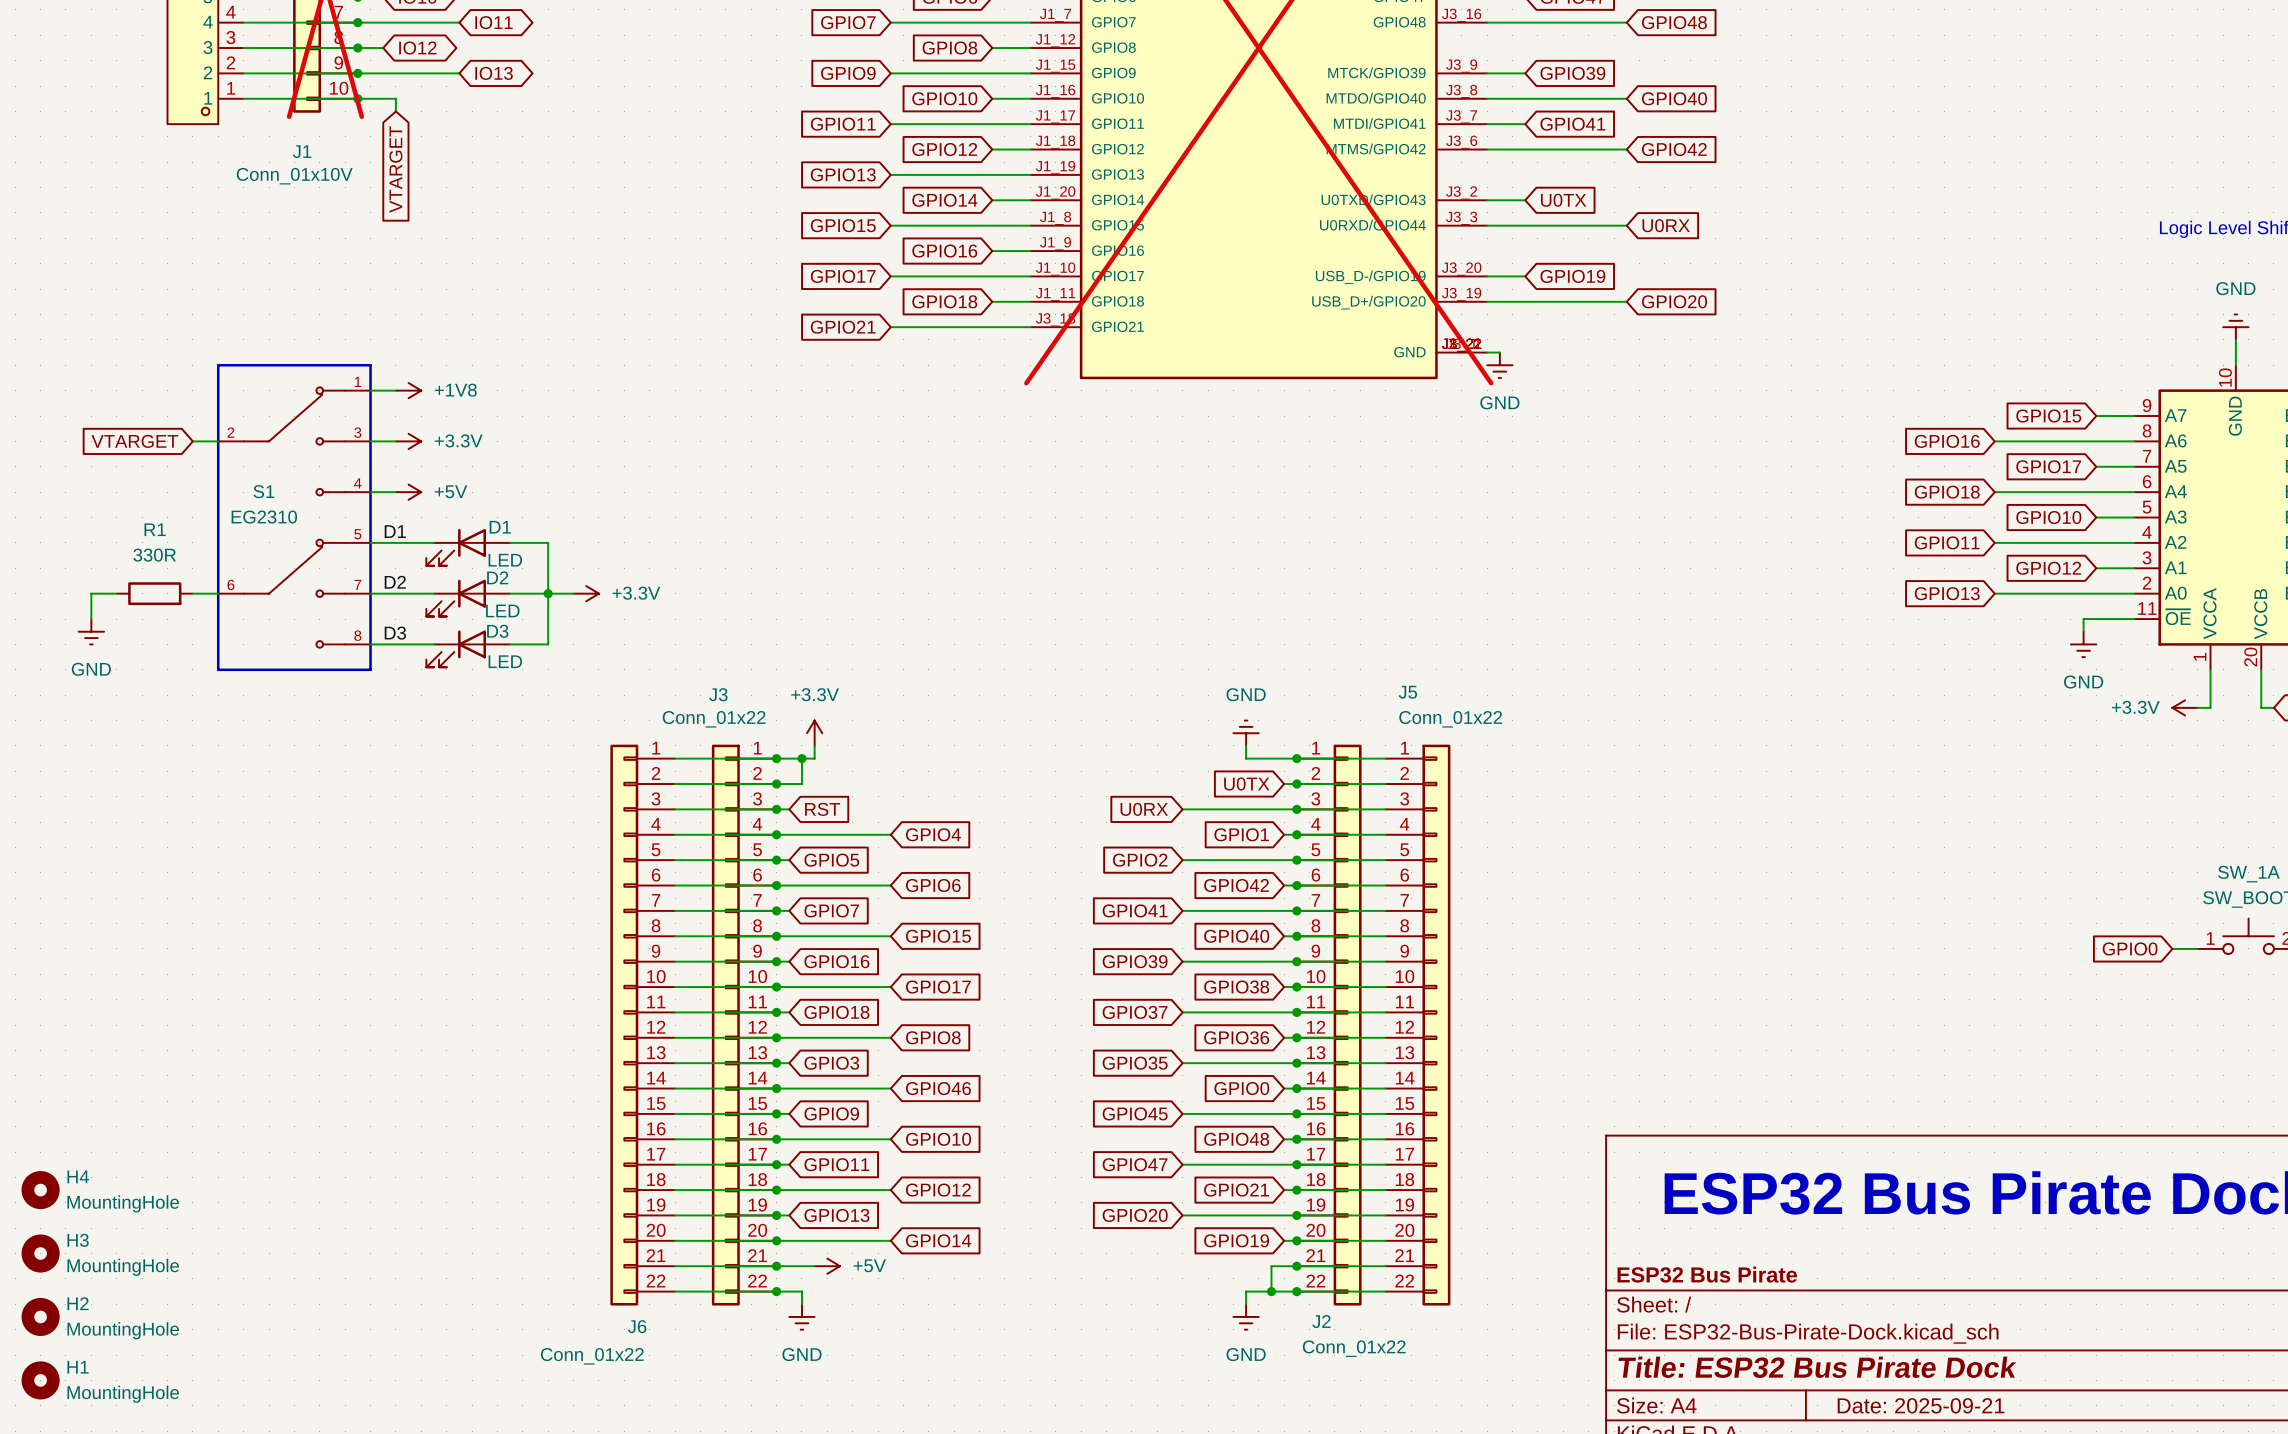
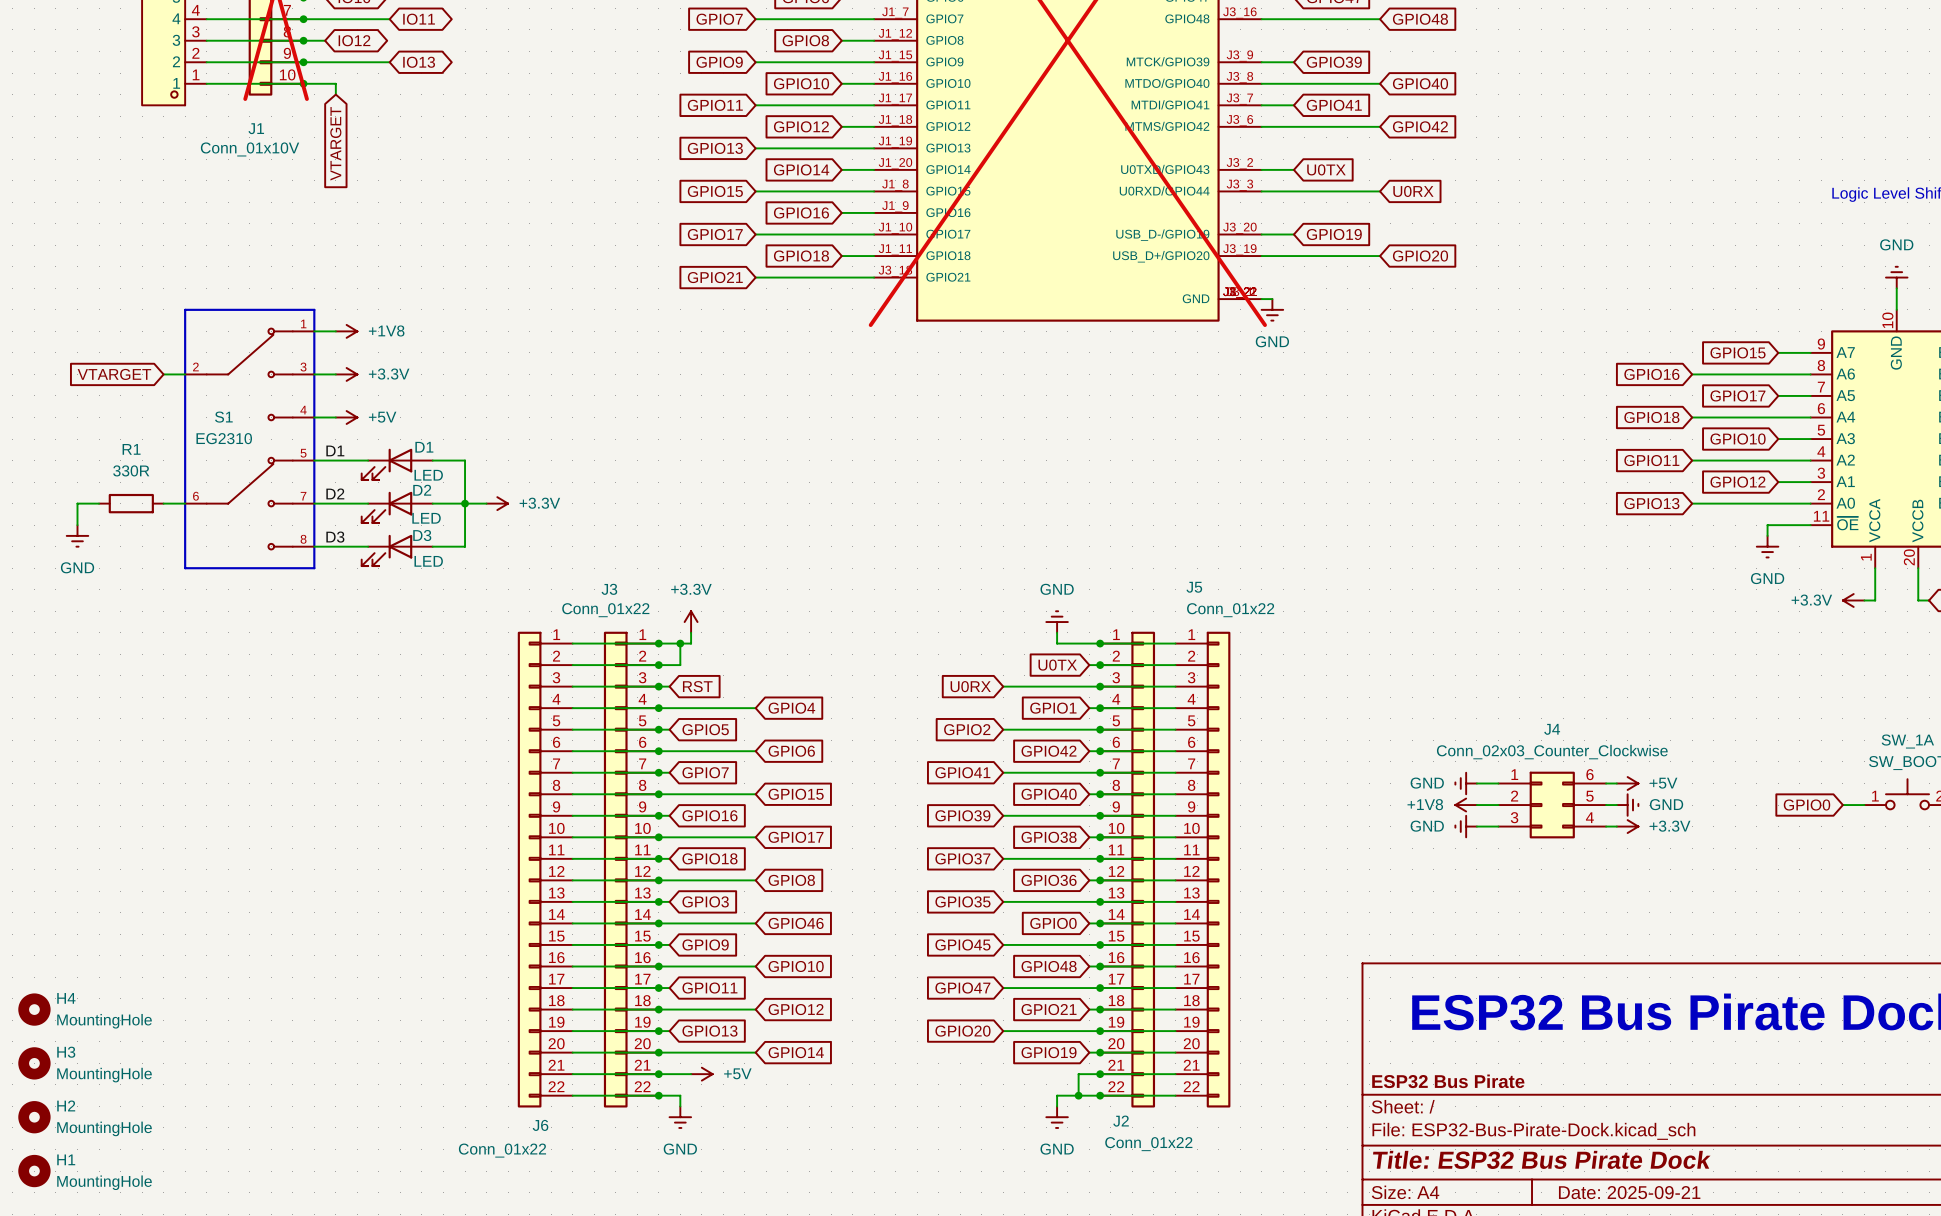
power symbol: none -> GND (1466, 783)
wire: none -> (1476, 783) (1498, 783)
wire: none -> (1606, 783) (1616, 783)
power symbol: none -> +5V (1627, 783)
power symbol: none -> +1V8 (1466, 805)
wire: none -> (1476, 805) (1498, 805)
J4: none -> Conn_02x03_Counter_Clockwise (1552, 805)
wire: none -> (1606, 805) (1616, 805)
power symbol: none -> GND (1627, 805)
power symbol: none -> GND (1466, 826)
wire: none -> (1476, 826) (1498, 826)
wire: none -> (1606, 826) (1616, 826)
power symbol: none -> +3.3V (1627, 826)

